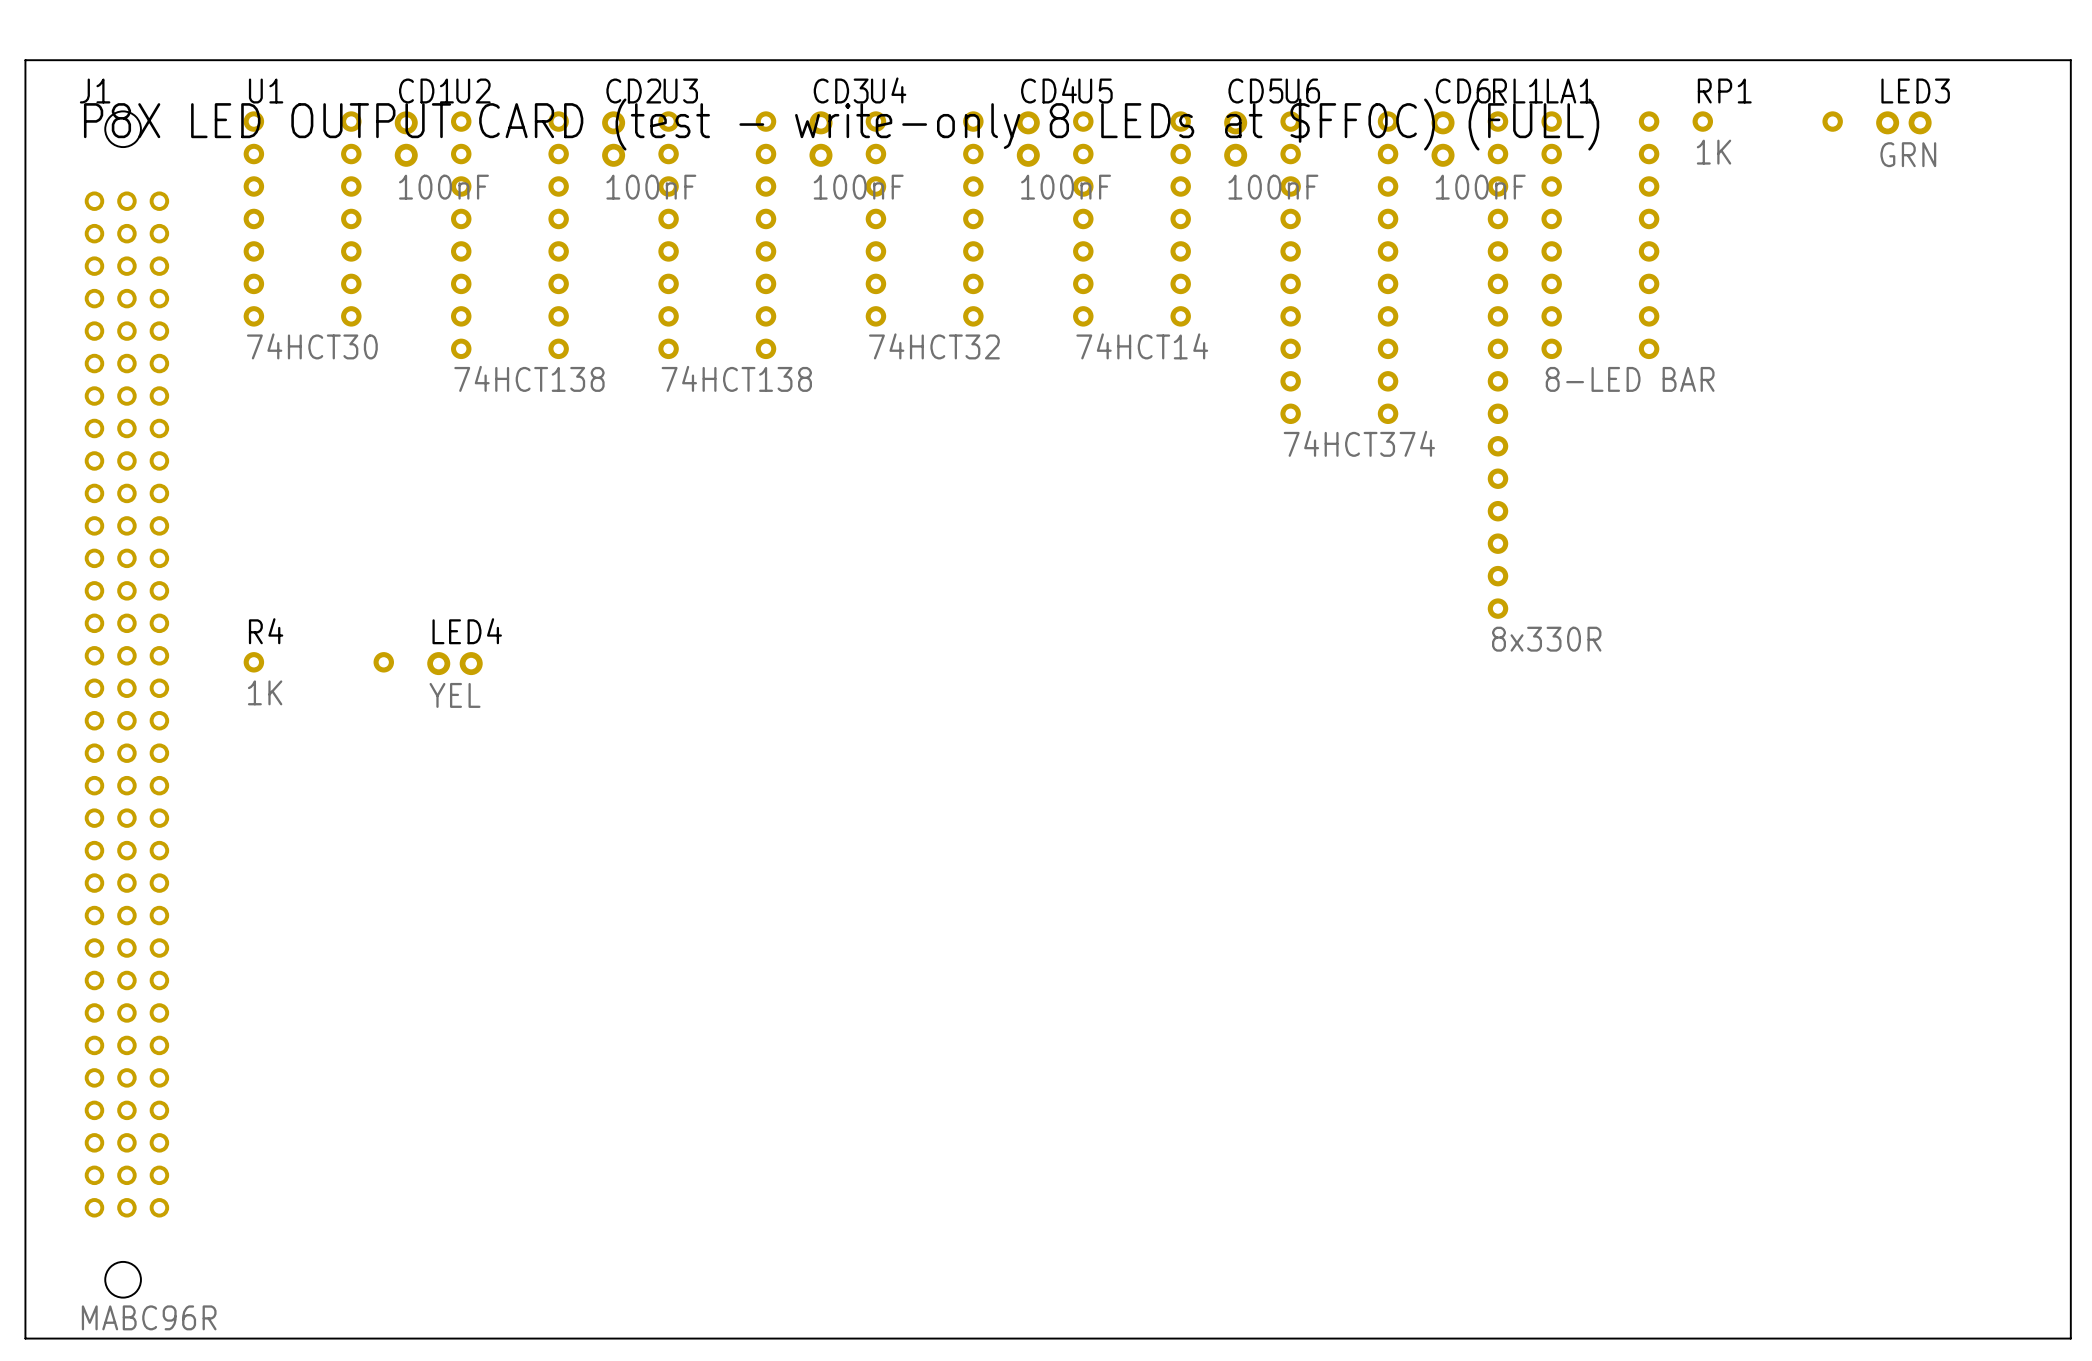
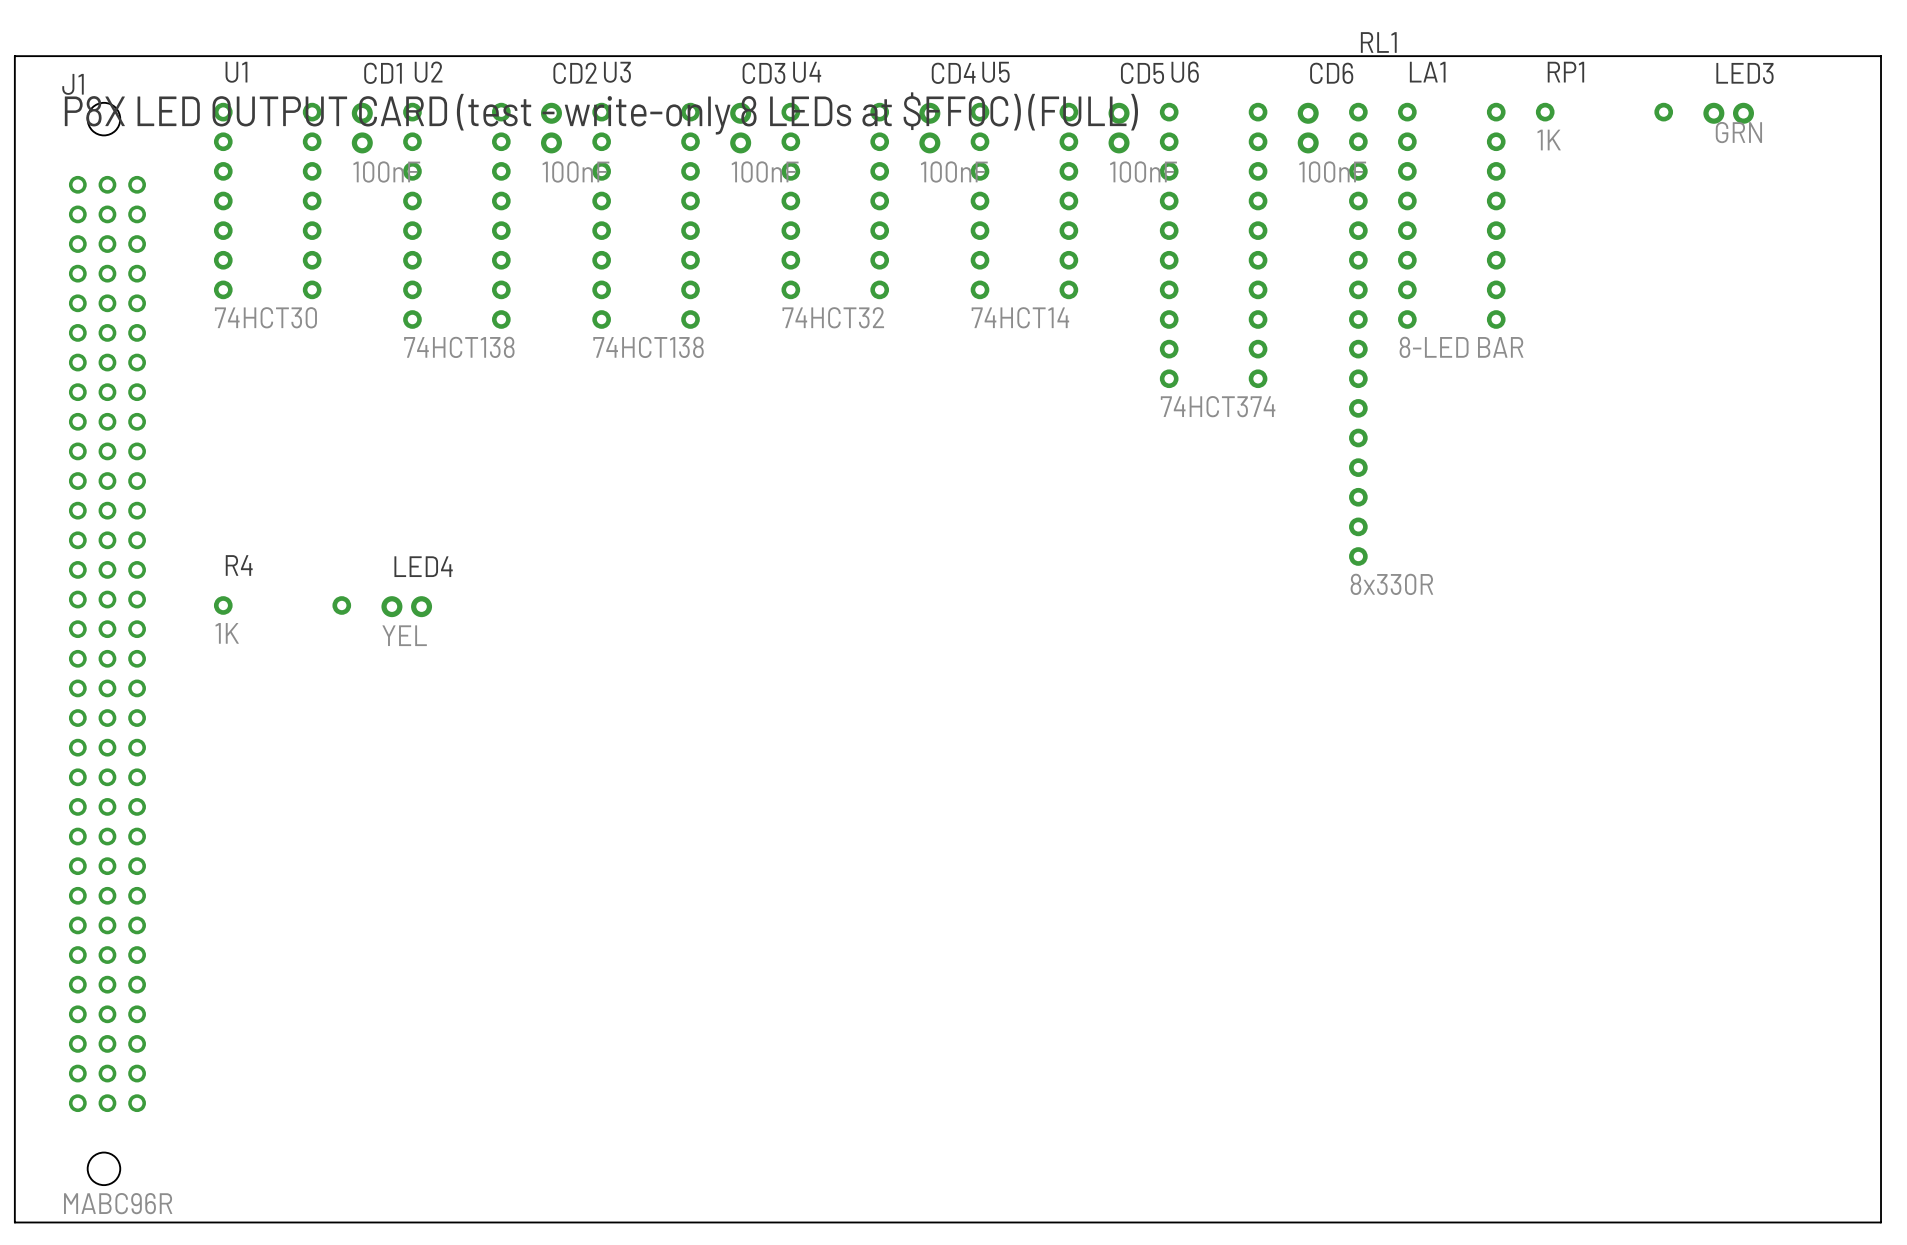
U4 name position: U4 (888, 90) -> U4 (807, 72)
CD4 name position: CD4 (1048, 90) -> CD4 (953, 73)
U1 name position: U1 (266, 91) -> U1 (236, 72)
CD1 name position: CD1 (426, 91) -> CD1 (383, 73)
U2 name position: U2 (473, 91) -> U2 (428, 72)
CD2 name position: CD2 (633, 91) -> CD2 (575, 73)
U3 name position: U3 (680, 91) -> U3 (617, 72)
CD3 name position: CD3 (841, 91) -> CD3 (763, 73)
U5 name position: U5 (1095, 91) -> U5 (995, 72)
CD5 name position: CD5 (1255, 91) -> CD5 (1142, 73)
U6 name position: U6 (1302, 91) -> U6 (1185, 72)
CD6 name position: CD6 (1463, 91) -> CD6 (1331, 73)
RL1 name position: RL1 (1517, 91) -> RL1 (1378, 42)
LA1 name position: LA1 (1570, 91) -> LA1 (1427, 72)
RP1 name position: RP1 (1724, 91) -> RP1 (1565, 72)
LED3 name position: LED3 (1915, 91) -> LED3 (1744, 73)
LED3 value position: GRN (1908, 154) -> GRN (1738, 132)
R4 name position: R4 (266, 631) -> R4 (239, 565)
LED4 name position: LED4 (467, 631) -> LED4 (423, 566)

